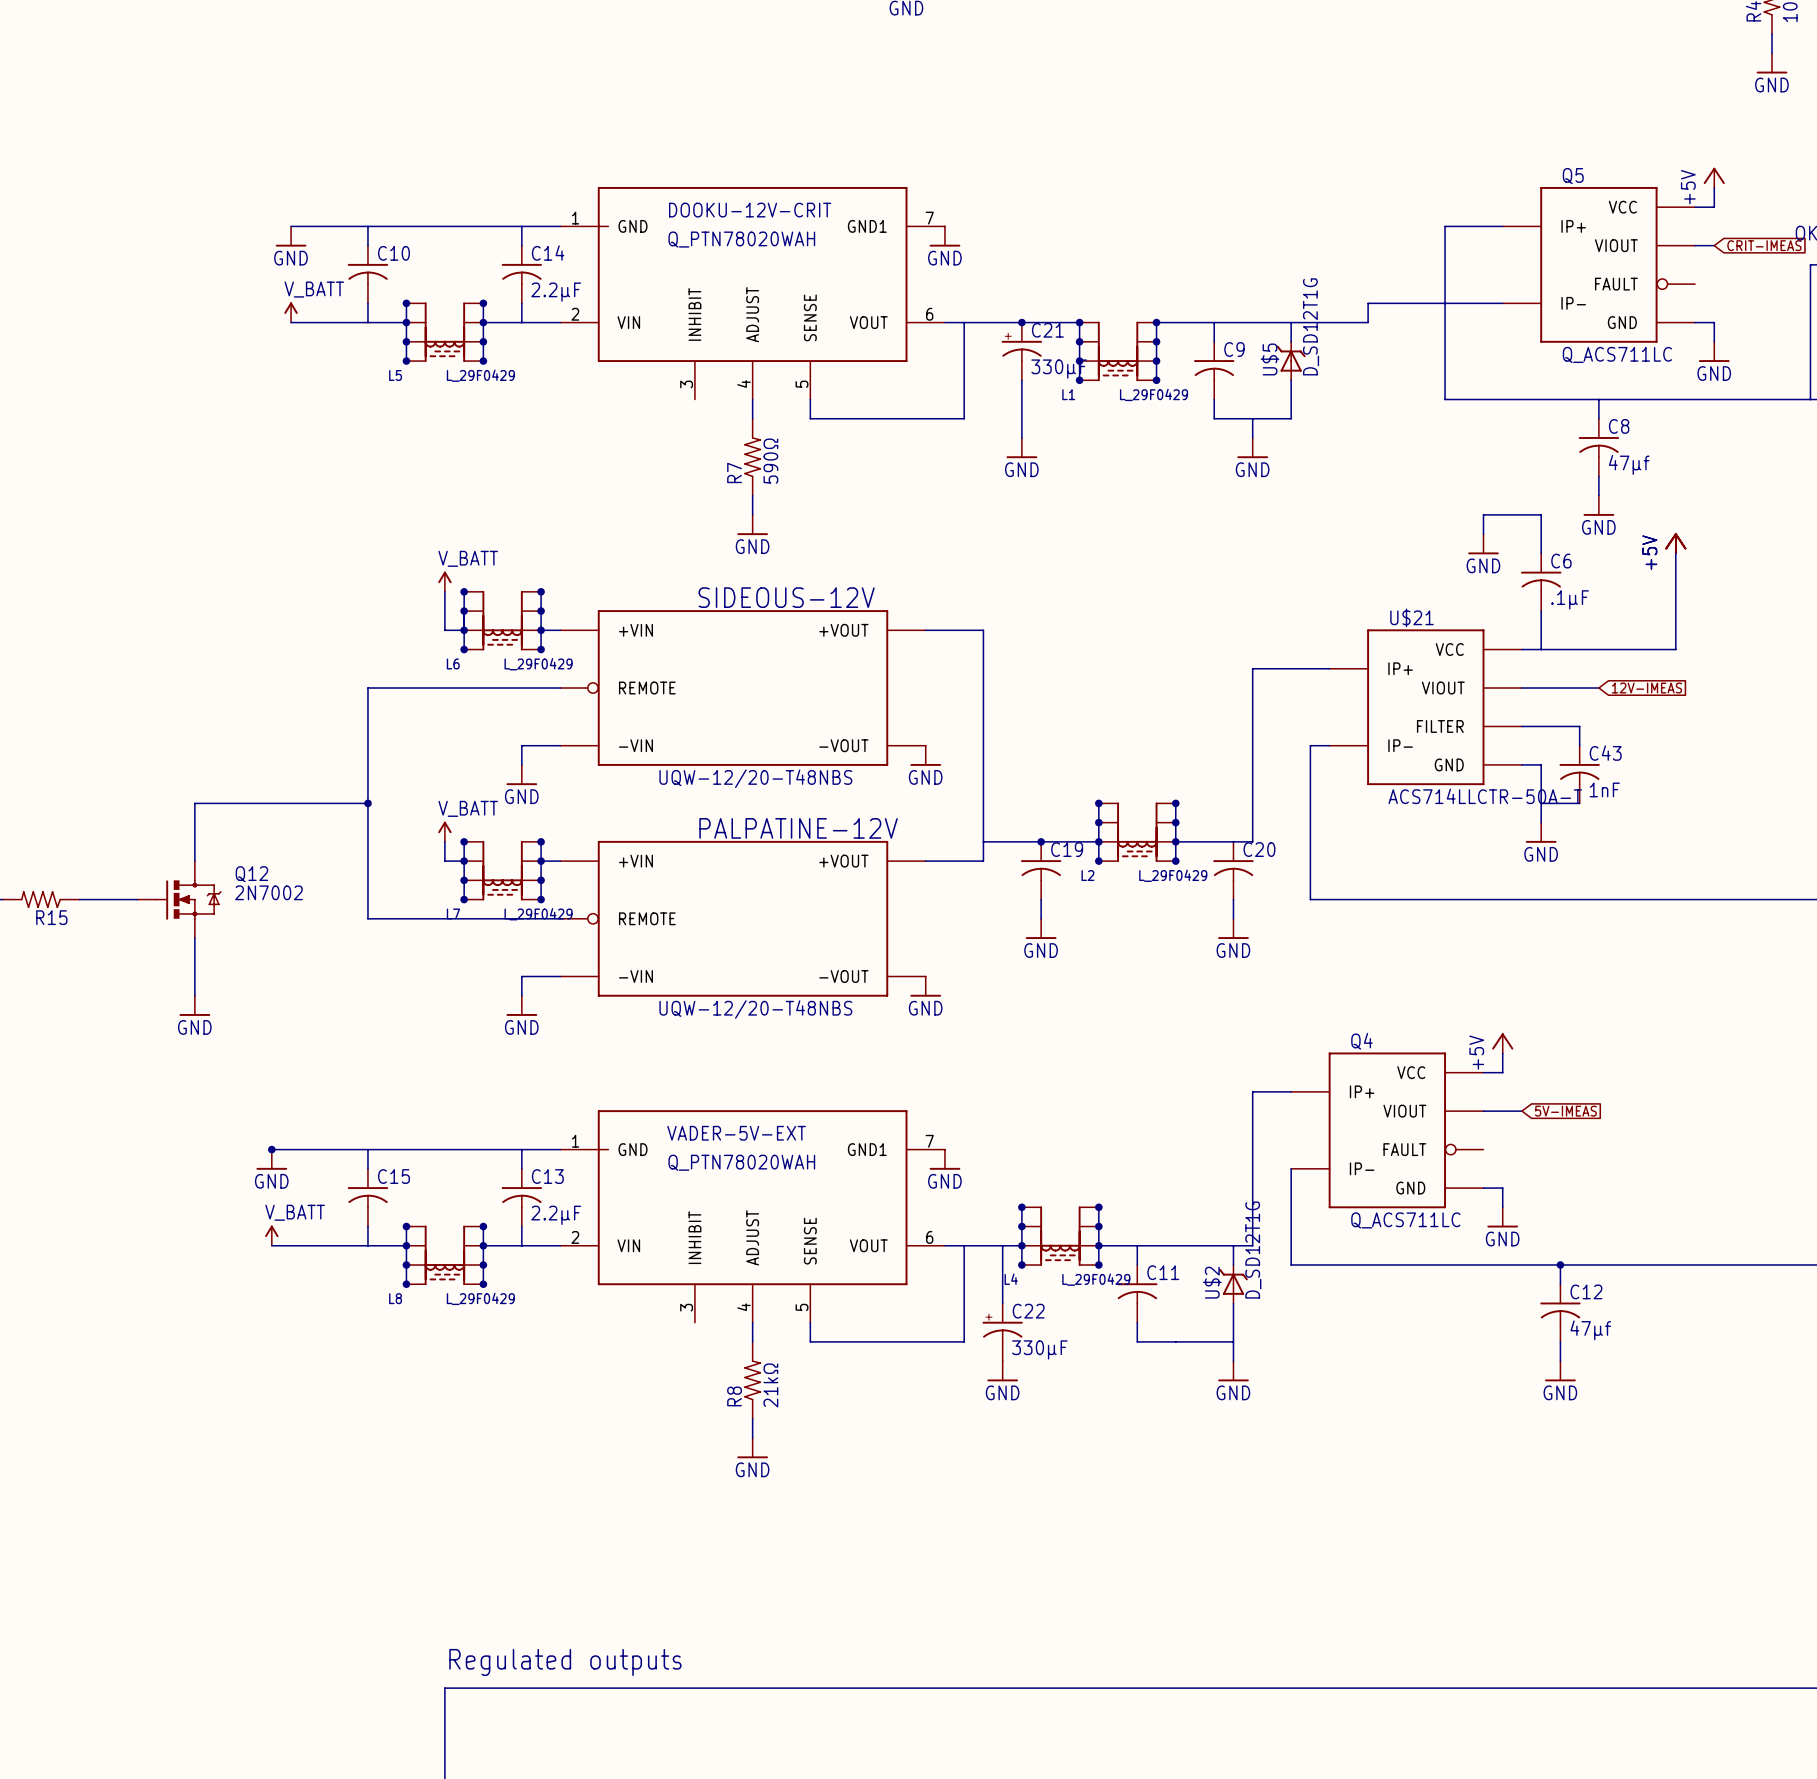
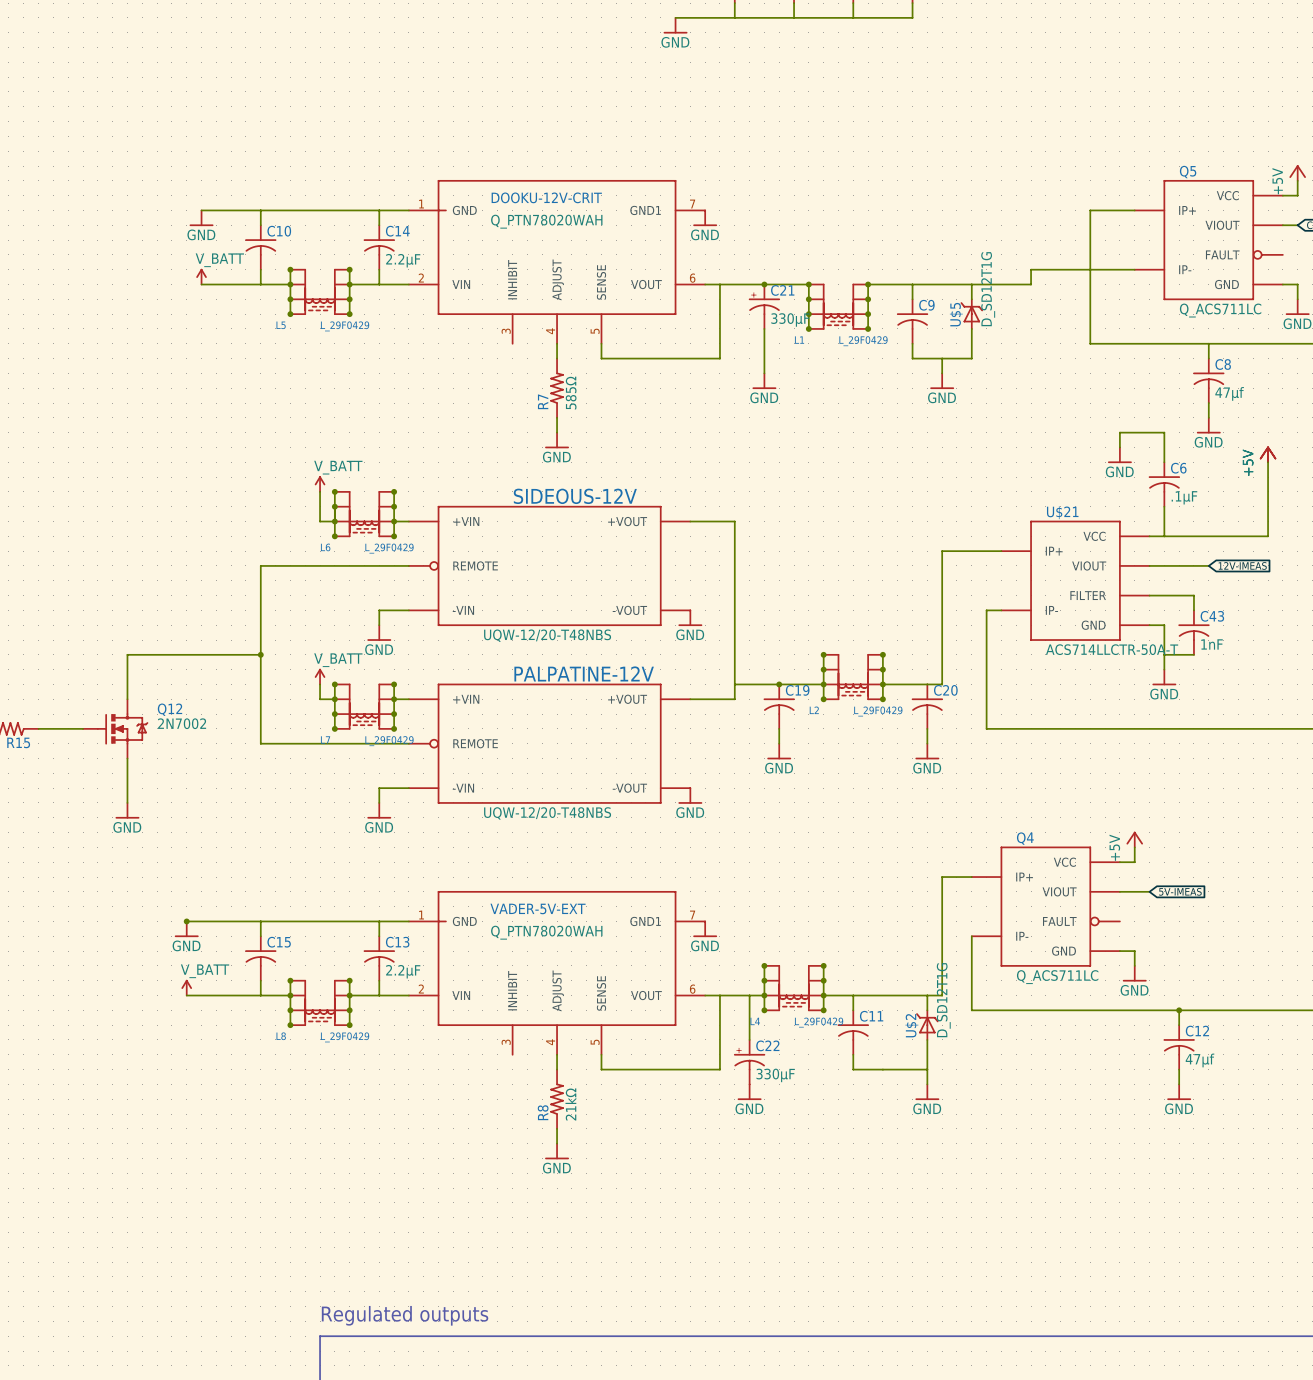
R7 value: 590Ω (770, 461) -> 585Ω (571, 393)

